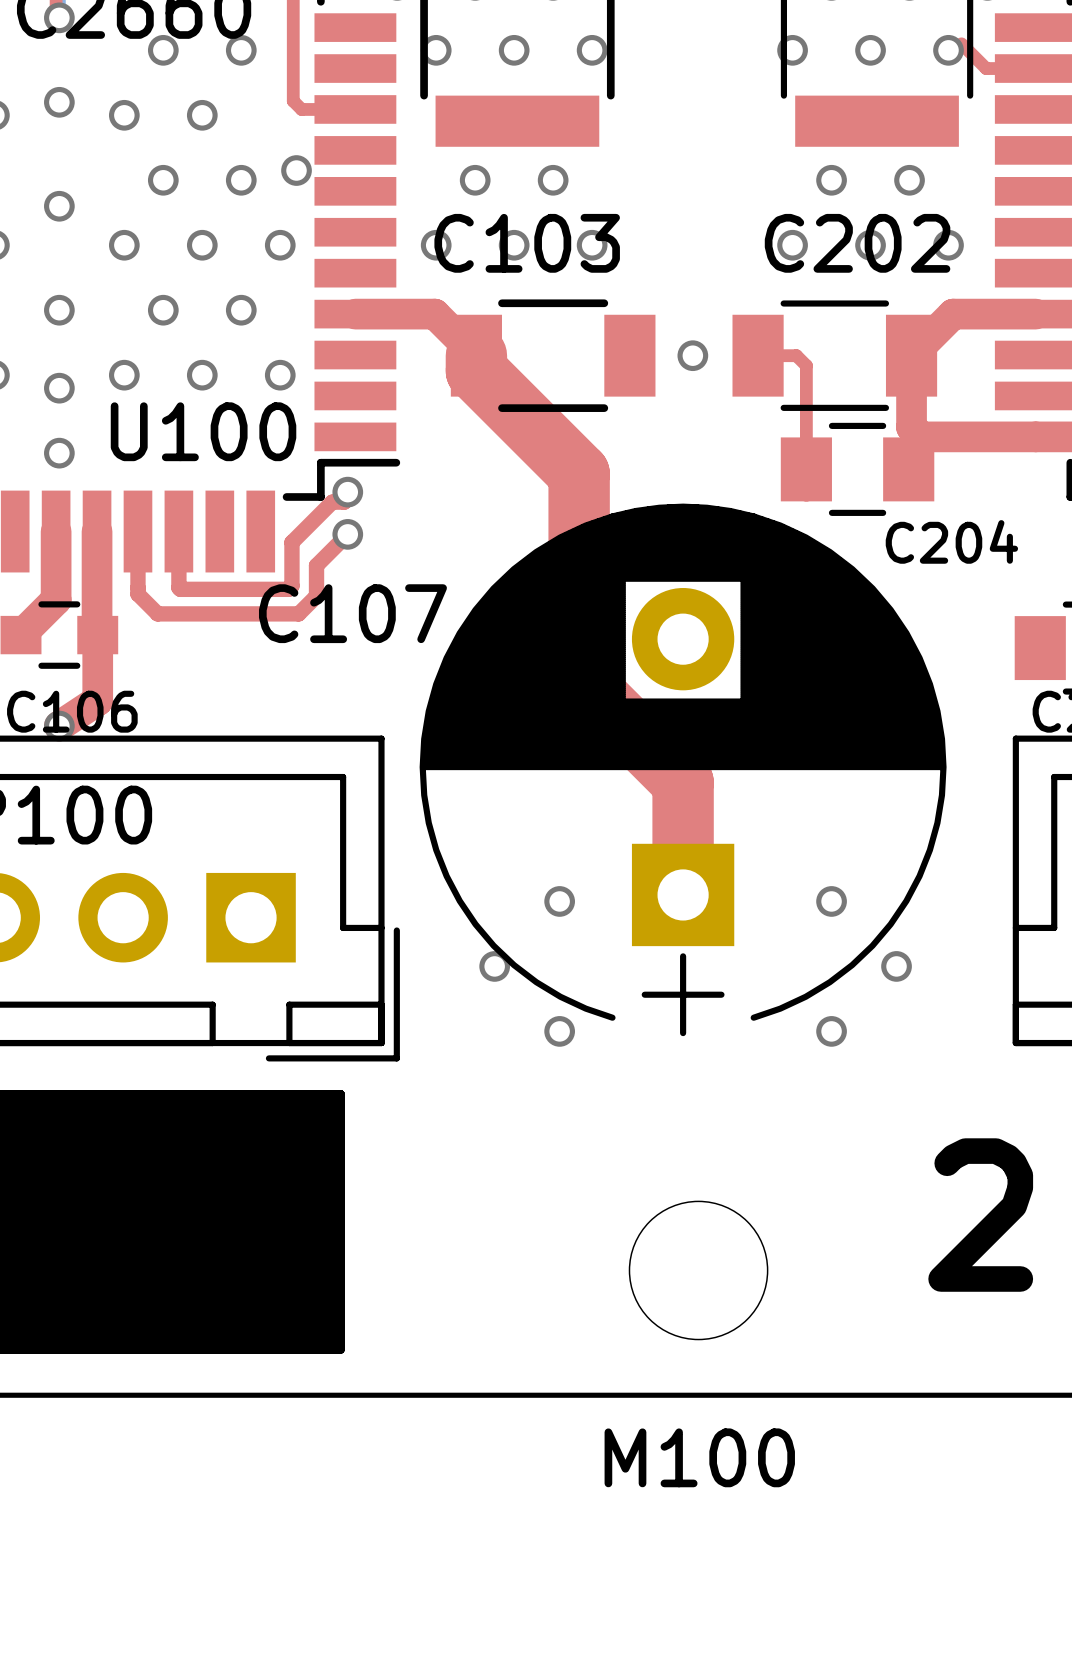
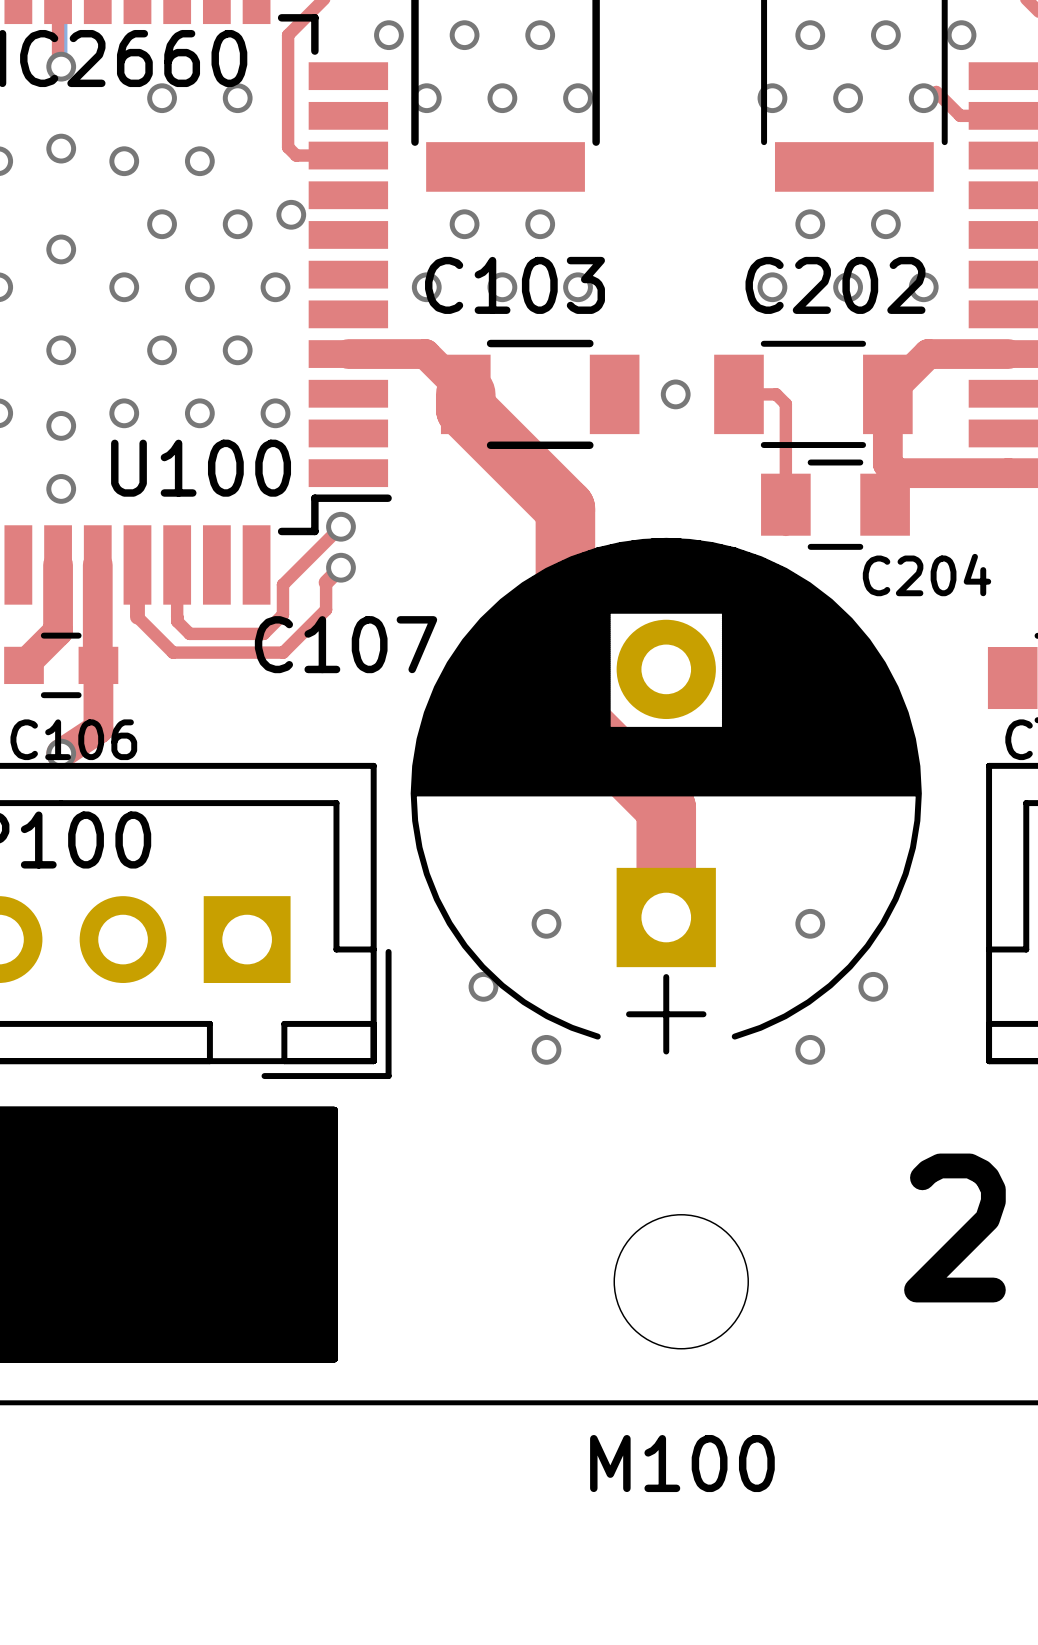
top track: (347, 492) (347, 498) (344, 502) (332, 502) (291, 542) (291, 585) (288, 589) (180, 589) (178, 531) -> (340, 526) (282, 584) (282, 614) (263, 633) (189, 633) (177, 621) (177, 564)
top track: (332, 549) (316, 565) (316, 596) (298, 613) (157, 613) (137, 594) (137, 585) -> (326, 582) (326, 609) (283, 652) (173, 652) (137, 617)

